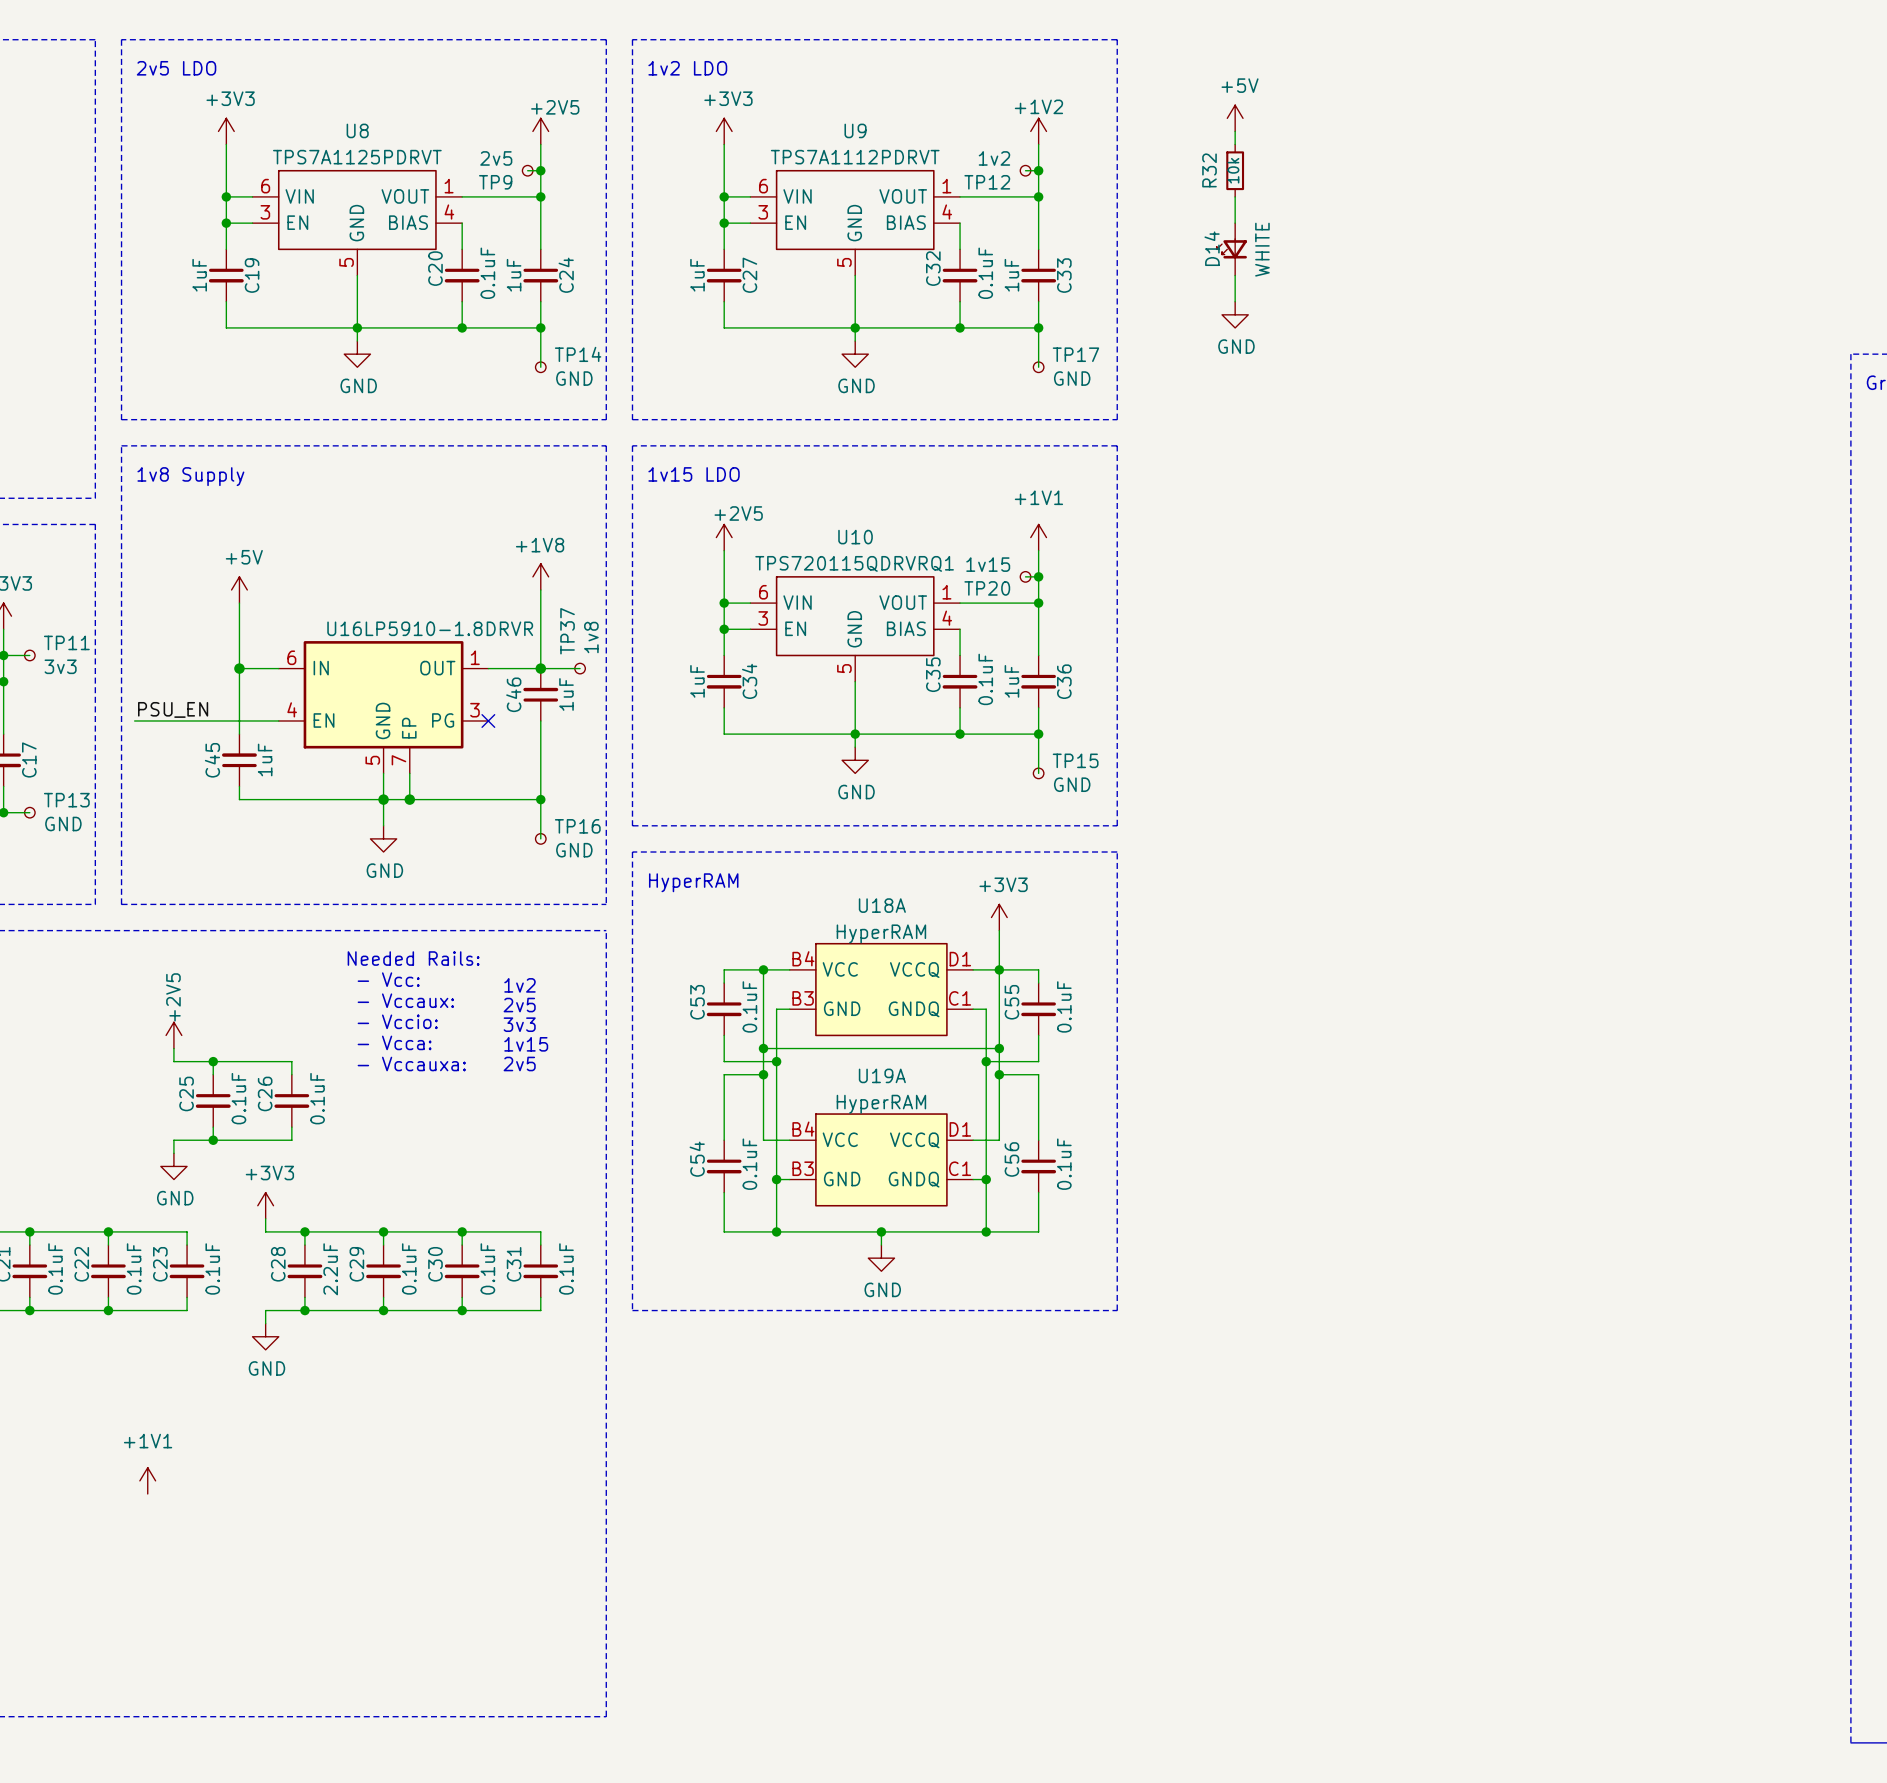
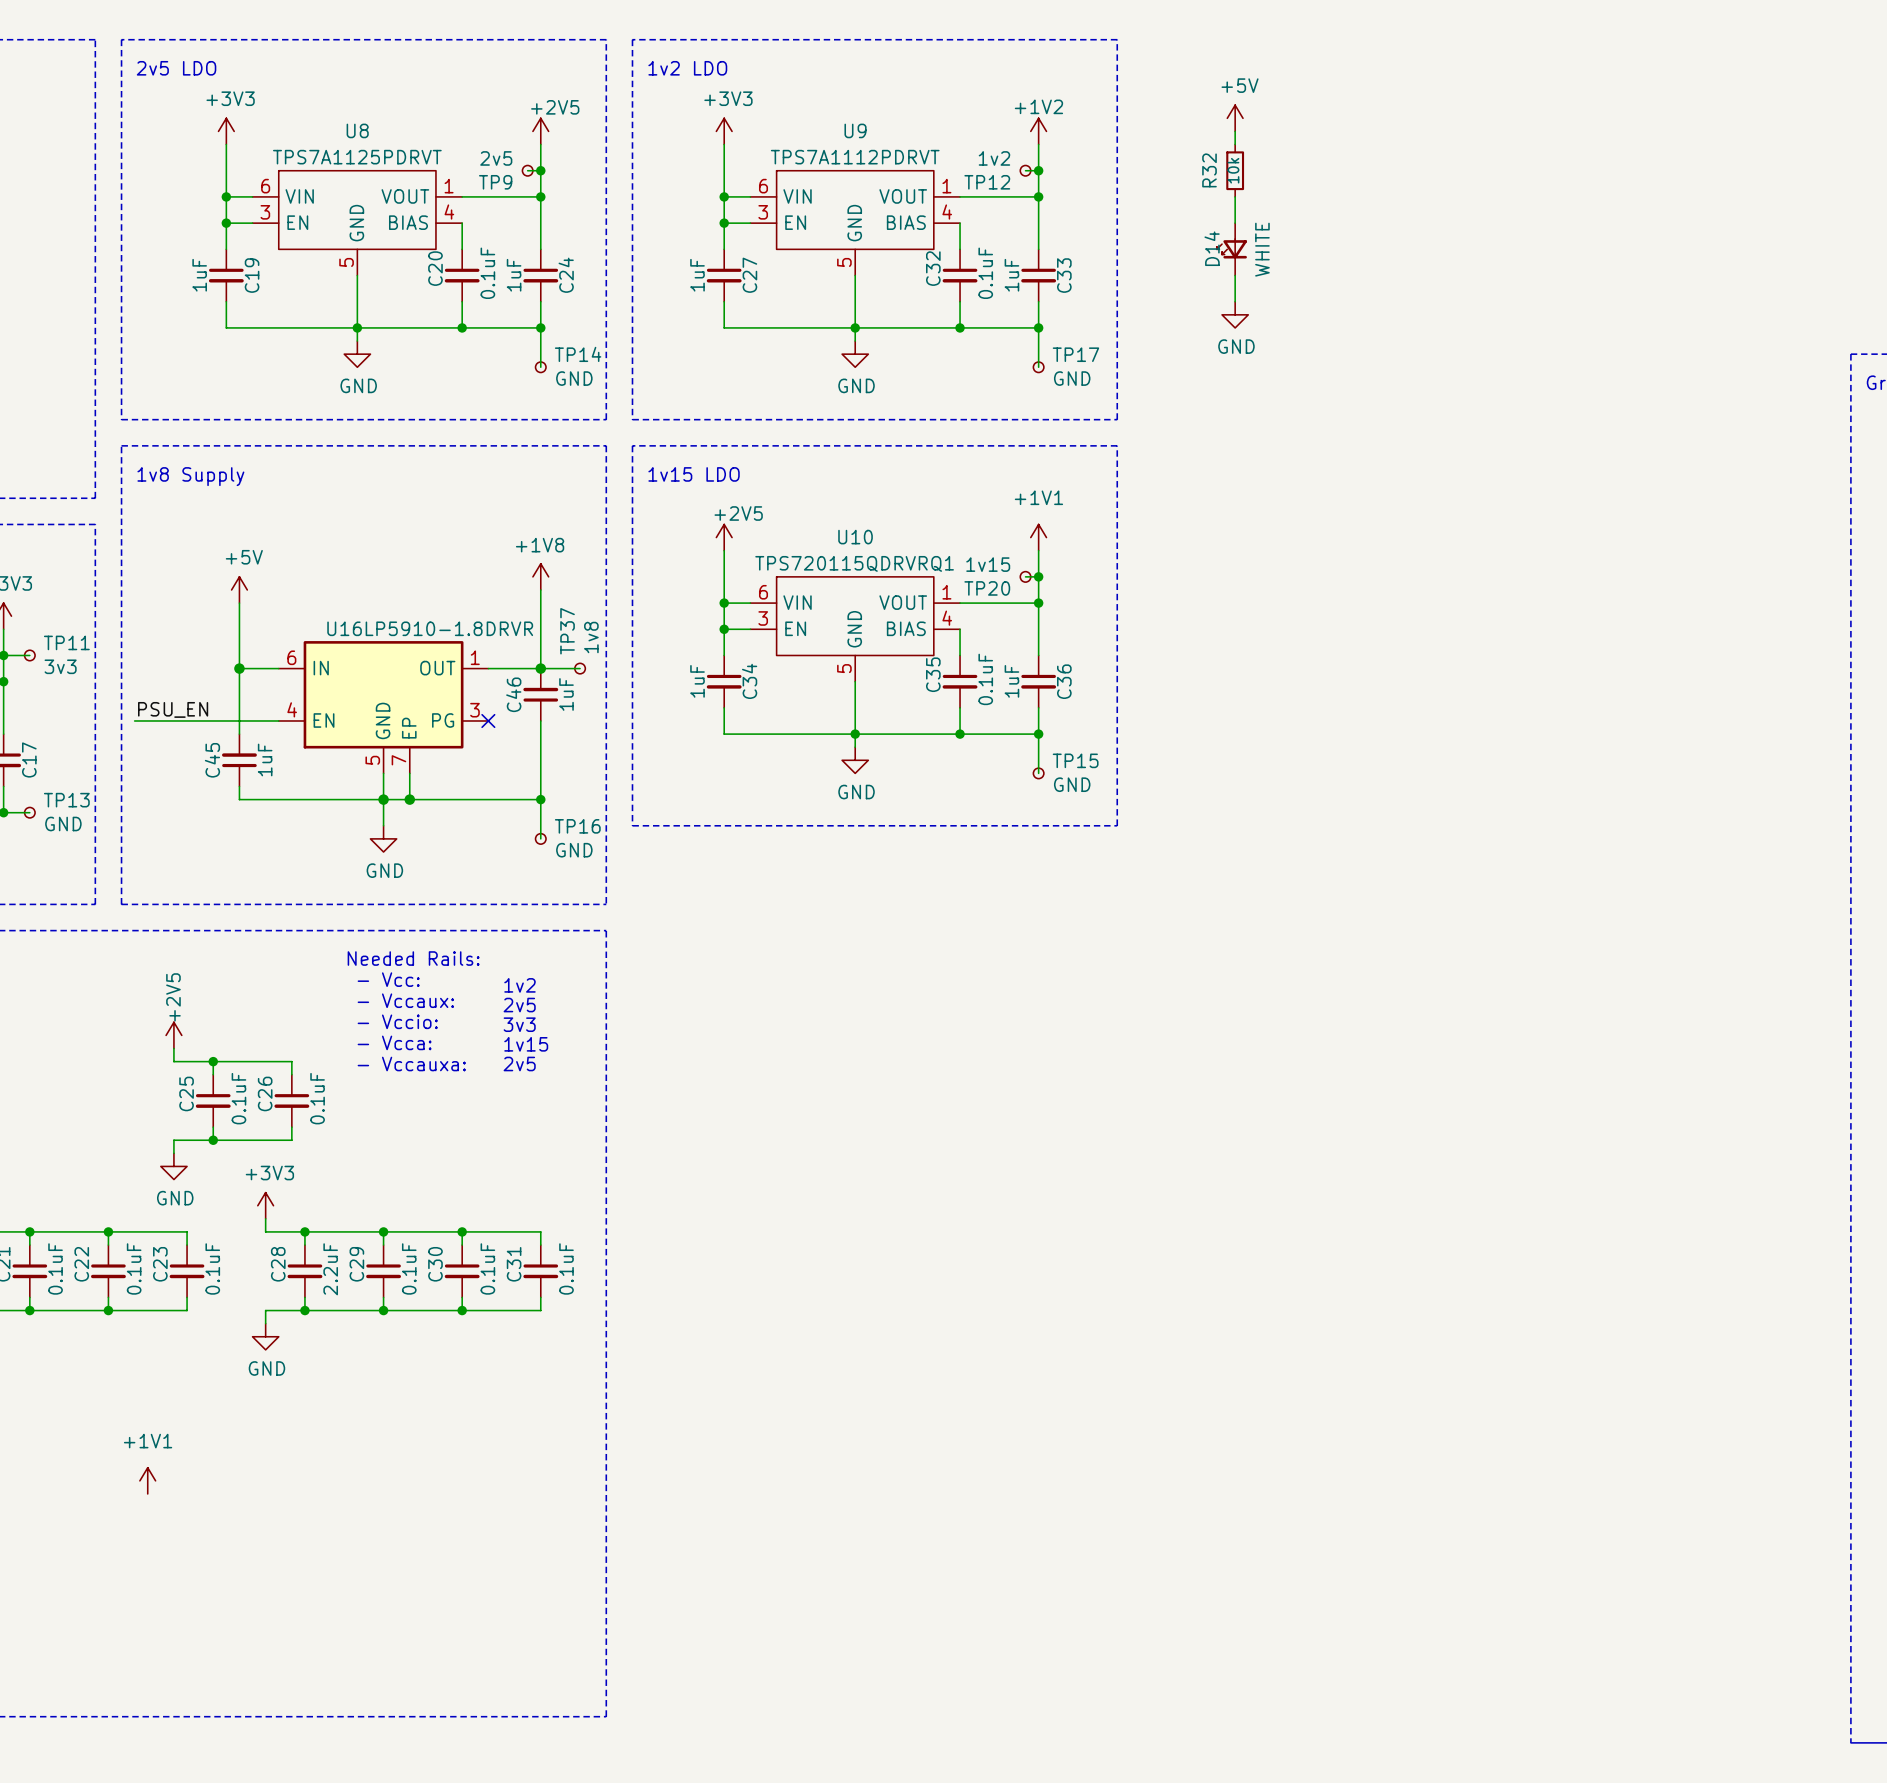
line: (632, 852) (1117, 852) (1117, 1310) (632, 1310) (632, 852) -> none
text: HyperRAM (693, 882) -> none
power symbol: +3V3 (999, 917) -> none
wire: (999, 930) (999, 1140) (973, 1140) -> none
wire: (763, 969) (763, 1140) (789, 1140) -> none
junction: (763, 969) -> none
wire: (789, 969) (724, 969) (724, 983) -> none
wire: (973, 969) (1038, 969) (1038, 983) -> none
junction: (999, 969) -> none
U18A: HyperRAM (881, 989) -> none
C53: 0.1uF (724, 1009) -> none
wire: (789, 1009) (776, 1009) (776, 1231) -> none
wire: (973, 1009) (986, 1009) (986, 1231) -> none
C55: 0.1uF (1038, 1009) -> none
wire: (724, 1035) (724, 1061) (776, 1061) -> none
wire: (1038, 1035) (1038, 1061) (986, 1061) -> none
wire: (763, 1048) (999, 1048) -> none
junction: (763, 1048) -> none
junction: (999, 1048) -> none
junction: (776, 1061) -> none
junction: (986, 1061) -> none
wire: (763, 1074) (724, 1074) (724, 1140) -> none
junction: (763, 1074) -> none
wire: (999, 1074) (1038, 1074) (1038, 1140) -> none
junction: (999, 1074) -> none
U19A: HyperRAM (881, 1159) -> none
C54: 0.1uF (724, 1166) -> none
C56: 0.1uF (1038, 1166) -> none
wire: (776, 1179) (789, 1179) -> none
junction: (776, 1179) -> none
wire: (973, 1179) (986, 1179) -> none
junction: (986, 1179) -> none
wire: (724, 1192) (724, 1231) (1038, 1231) (1038, 1192) -> none
junction: (776, 1231) -> none
wire: (881, 1231) (881, 1245) -> none
junction: (881, 1231) -> none
junction: (986, 1231) -> none
power symbol: GND (881, 1258) -> none

